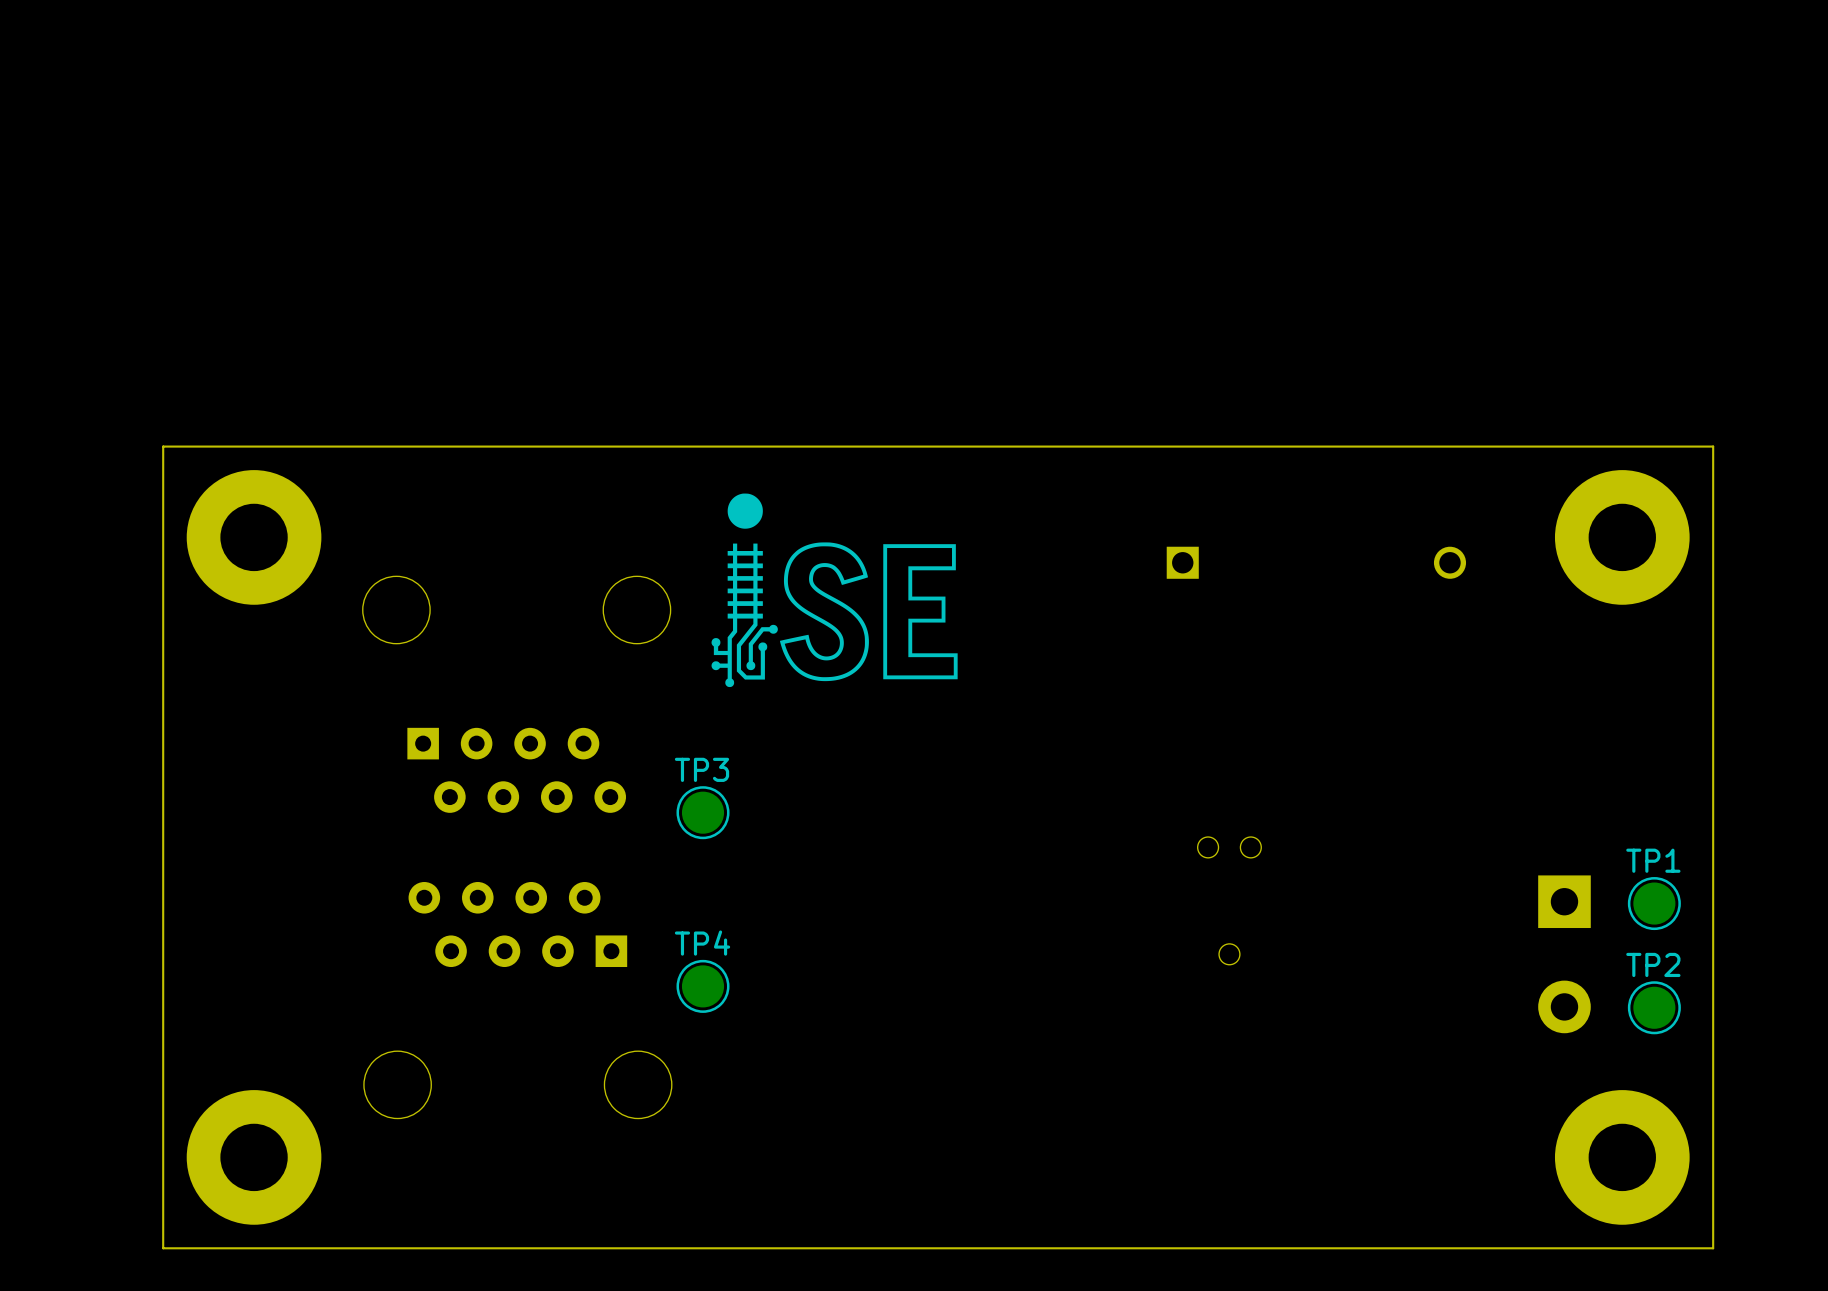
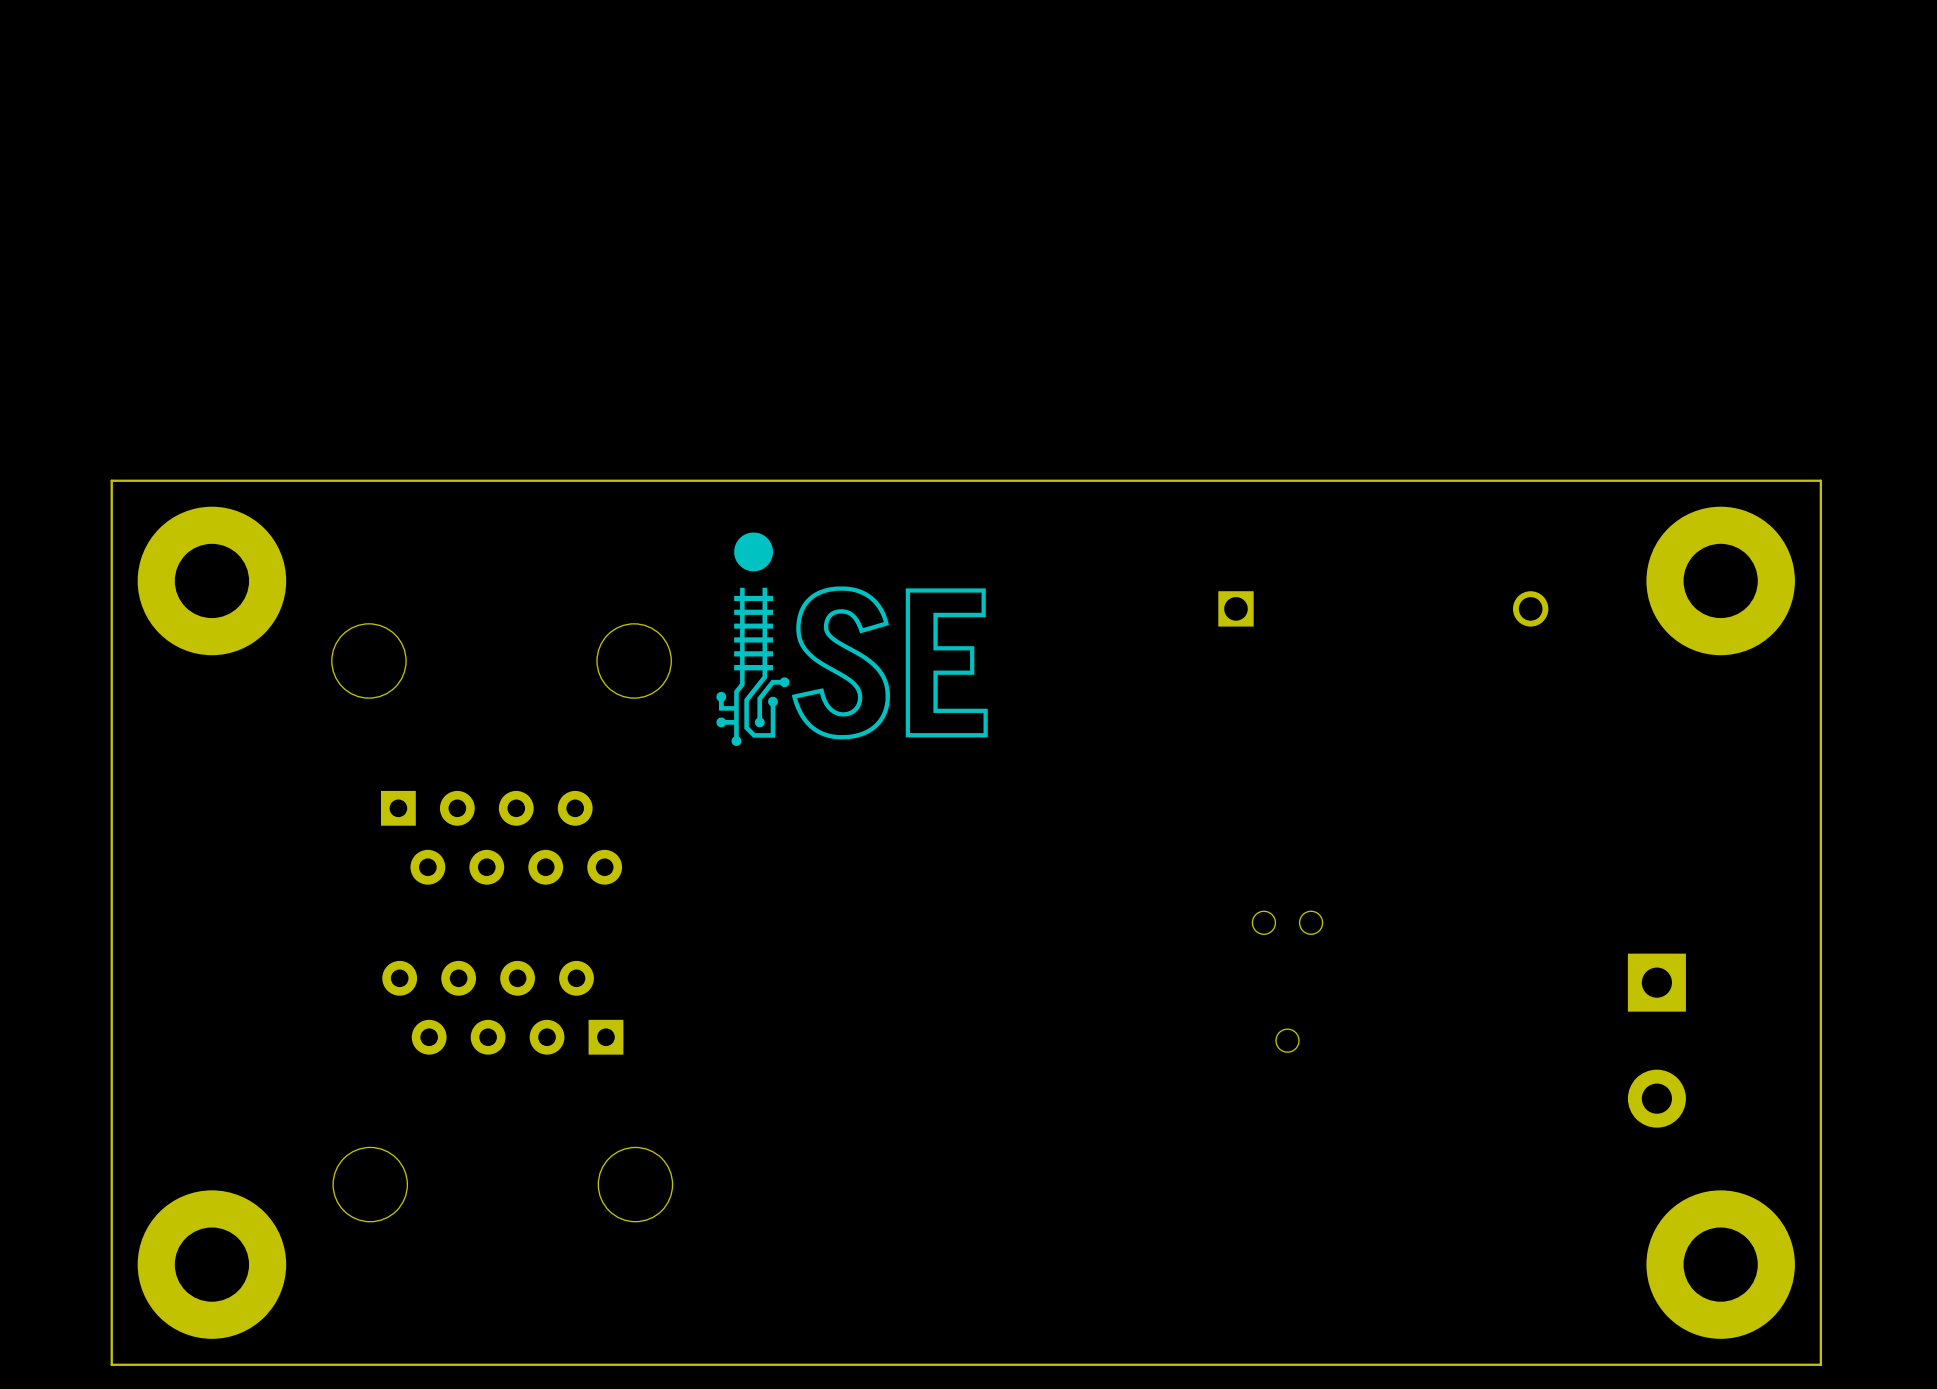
TP3: (703, 812) -> none
TP1: (1654, 903) -> none
TP4: (703, 986) -> none
TP2: (1654, 1007) -> none

